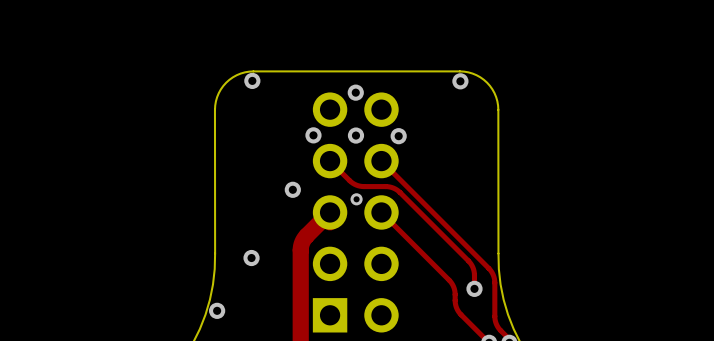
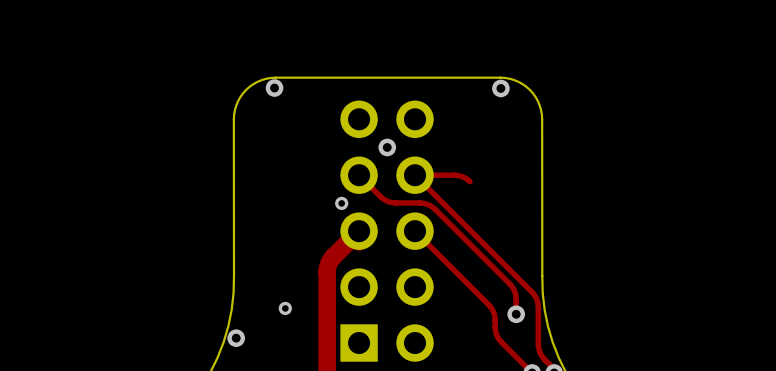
via: (355, 92) -> none
via: (313, 135) -> none
via: (398, 136) -> none
track: none -> (415, 175) (456, 175) (469, 181)
via: (292, 189) -> none
via position: (356, 199) -> (341, 203)
via: (251, 258) -> none
via: none -> (285, 308)

